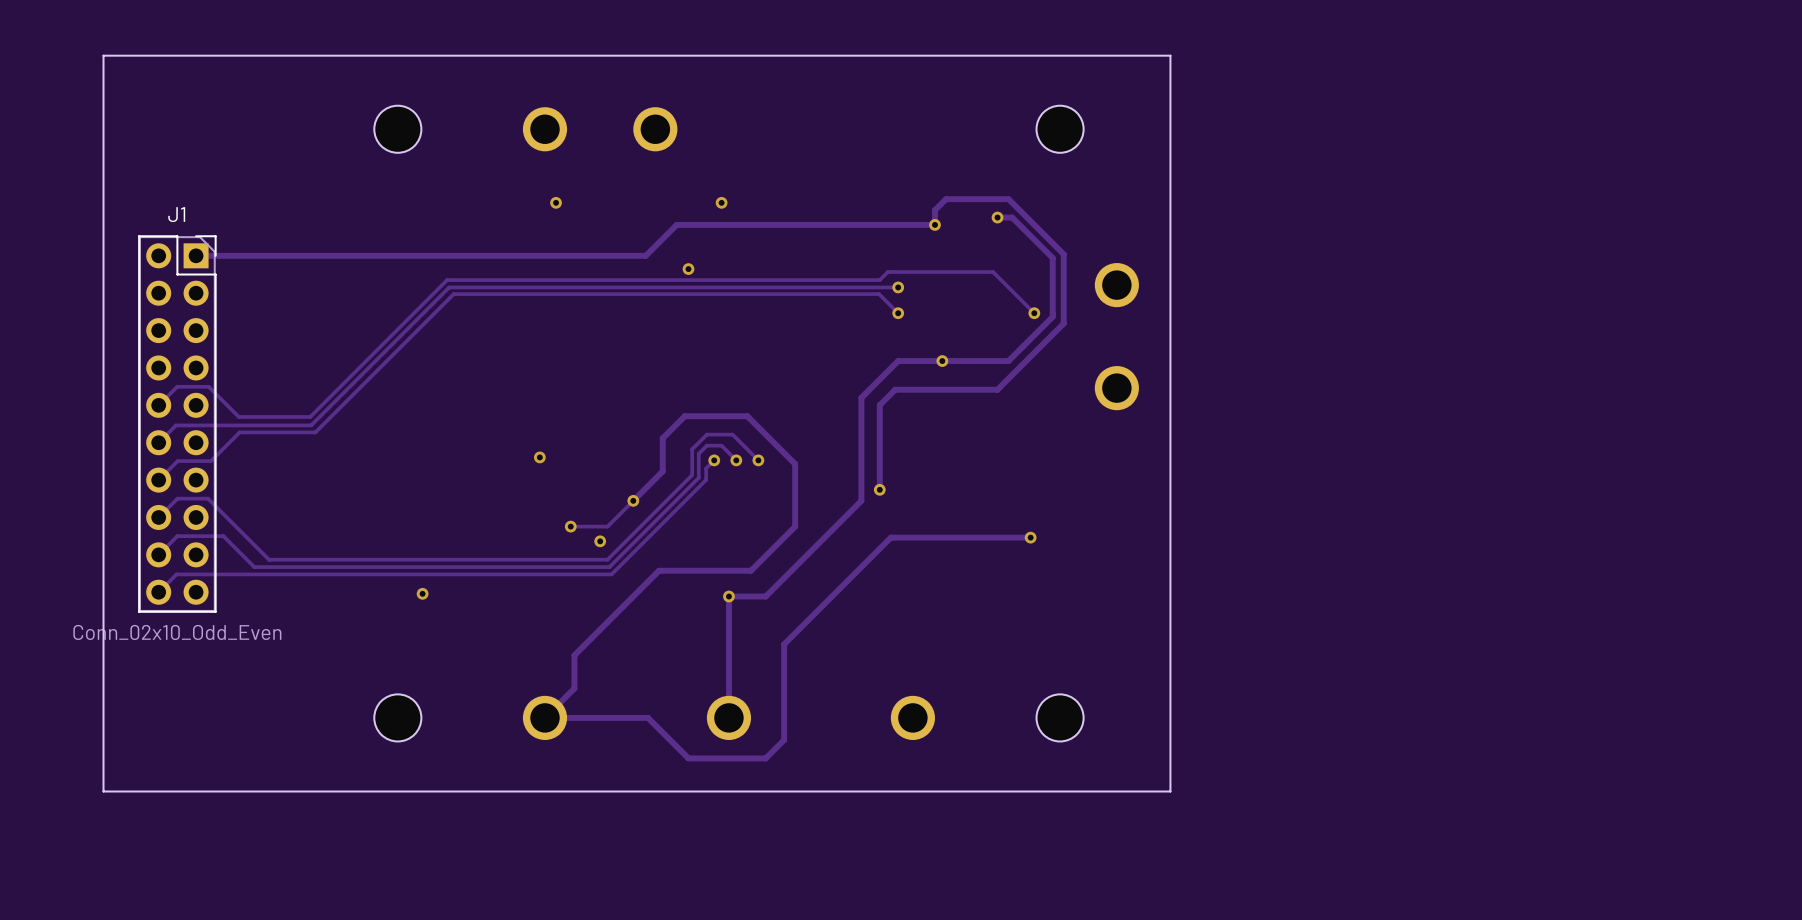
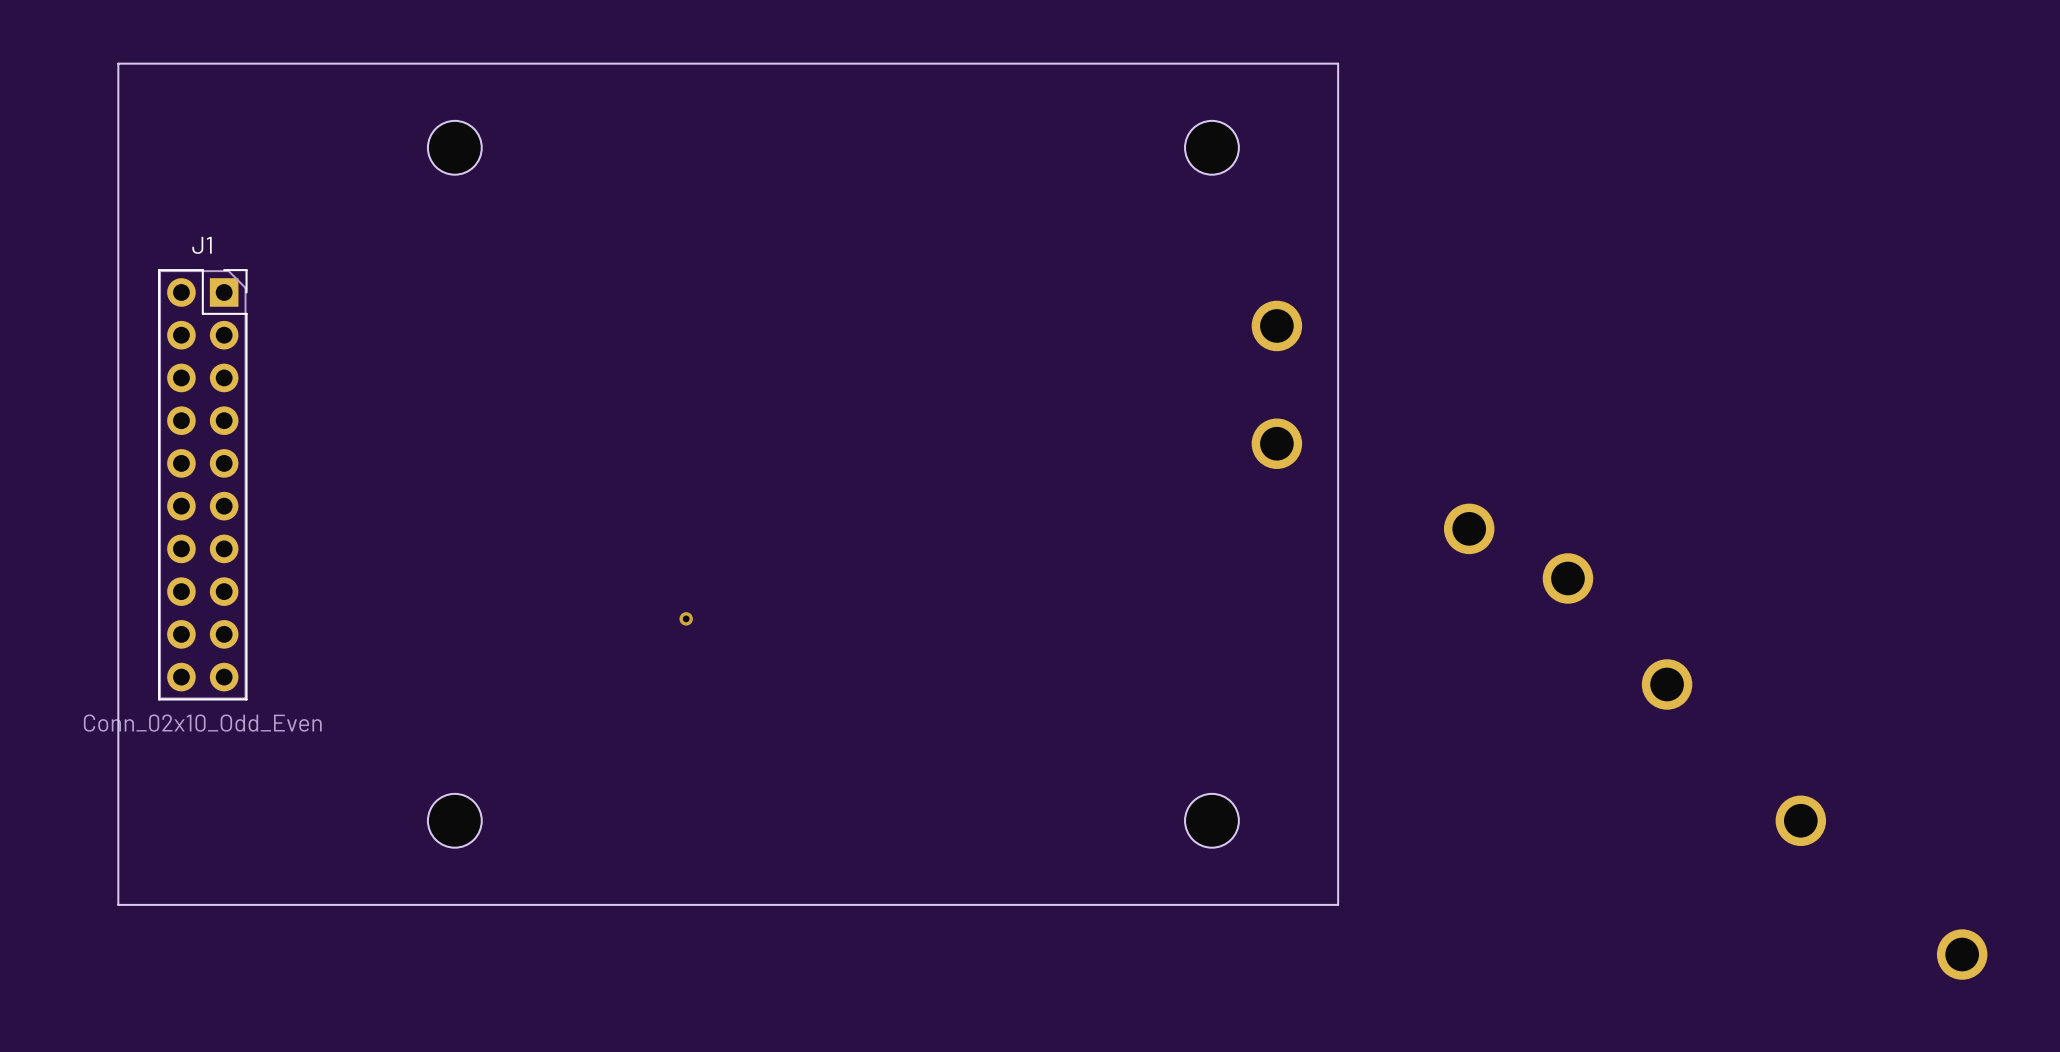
part: (545, 129) -> none
part: (655, 129) -> none
via: (556, 202) -> none
via: (721, 202) -> none
track: (997, 217) (1012, 217) (1052, 258) (1052, 316) (1008, 361) (898, 361) (861, 397) (861, 500) (765, 596) (728, 596) (728, 717) -> none
via: (997, 217) -> none
via: (934, 224) -> none
track: (196, 255) (645, 255) (676, 224) (934, 224) (934, 210) (946, 199) (1008, 199) (1063, 254) (1063, 323) (997, 389) (895, 389) (879, 405) (879, 489) -> none
via: (688, 269) -> none
track: (898, 287) (449, 287) (311, 425) (175, 425) (158, 442) -> none
via: (898, 287) -> none
track: (898, 313) (879, 294) (453, 294) (315, 432) (239, 432) (210, 461) (177, 461) (158, 480) -> none
via: (898, 313) -> none
track: (1034, 313) (993, 272) (887, 272) (879, 280) (447, 280) (310, 416) (238, 416) (208, 386) (177, 386) (158, 405) -> none
via: (1034, 313) -> none
via: (942, 361) -> none
via: (539, 457) -> none
track: (714, 460) (706, 468) (706, 479) (611, 574) (176, 574) (158, 592) -> none
via: (714, 460) -> none
track: (736, 460) (721, 445) (706, 445) (698, 453) (698, 477) (609, 567) (254, 567) (223, 536) (177, 536) (158, 554) -> none
via: (736, 460) -> none
track: (758, 460) (732, 434) (706, 434) (692, 449) (692, 475) (607, 559) (269, 559) (207, 498) (177, 498) (158, 517) -> none
via: (758, 460) -> none
part: none -> (1469, 528)
via: (879, 489) -> none
via: (633, 500) -> none
part: none -> (1567, 578)
track: (570, 526) (607, 526) (662, 471) (662, 438) (684, 416) (747, 416) (795, 464) (795, 526) (751, 570) (659, 570) (574, 655) (574, 688) (545, 717) (648, 717) (688, 758) (765, 758) (784, 739) (784, 644) (890, 537) (1030, 537) -> none
via: (570, 526) -> none
via: (1030, 537) -> none
via: (422, 593) -> none
via: (728, 596) -> none
part: none -> (1667, 684)
part: (545, 717) -> none
part: (728, 717) -> none
part: (912, 717) -> none
part: none -> (1800, 820)
part: none -> (1962, 954)

